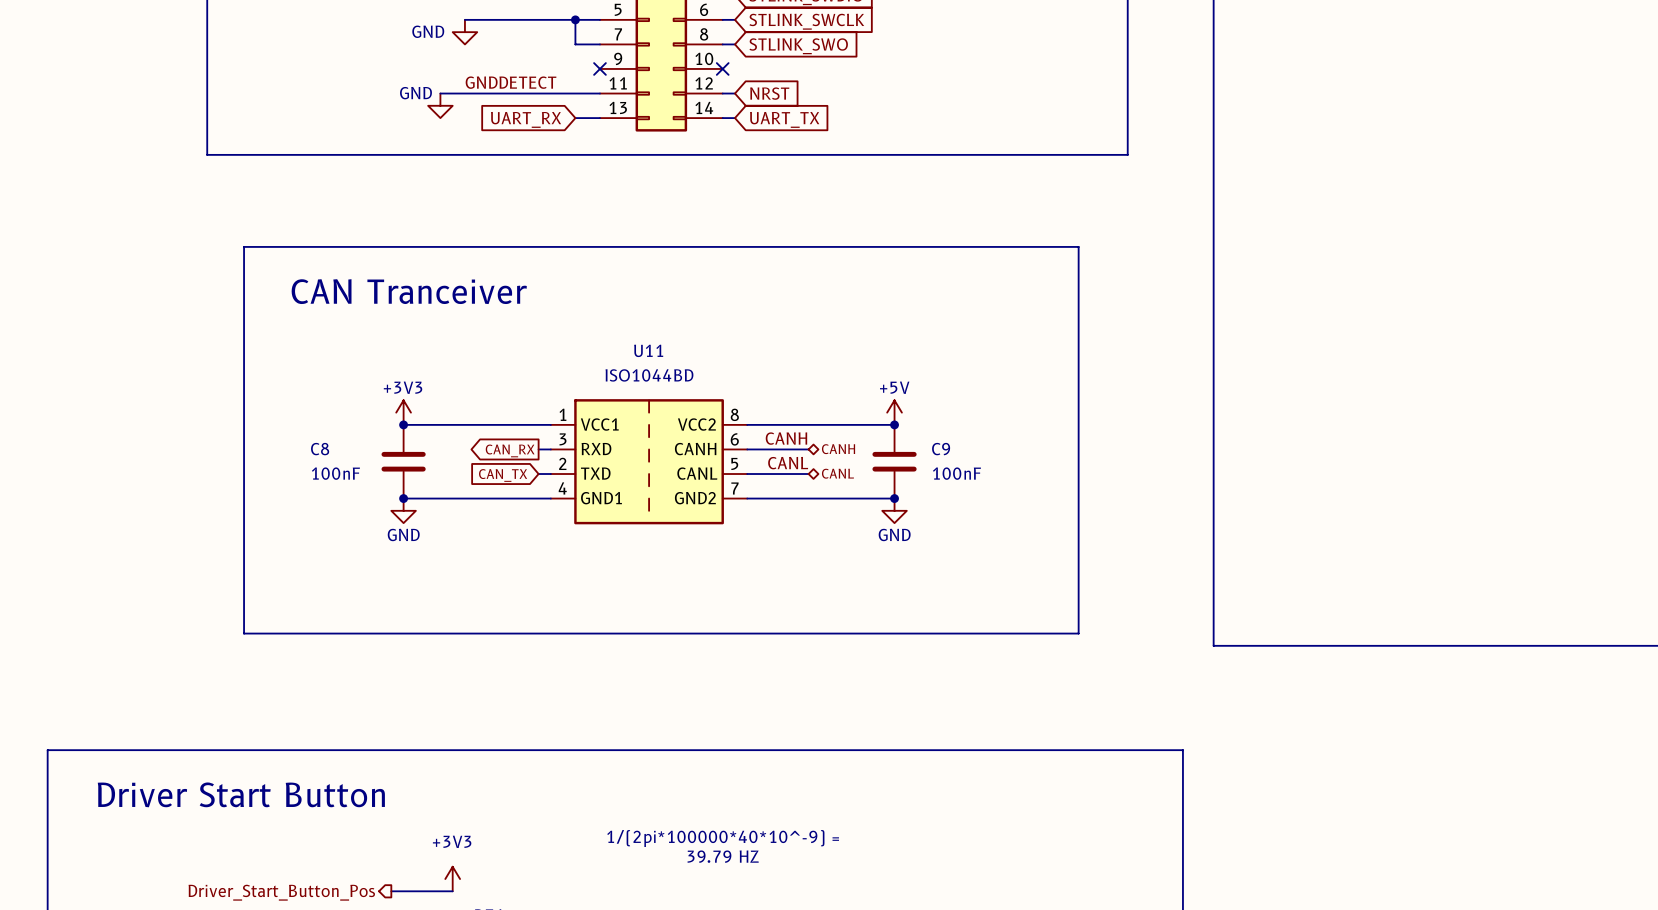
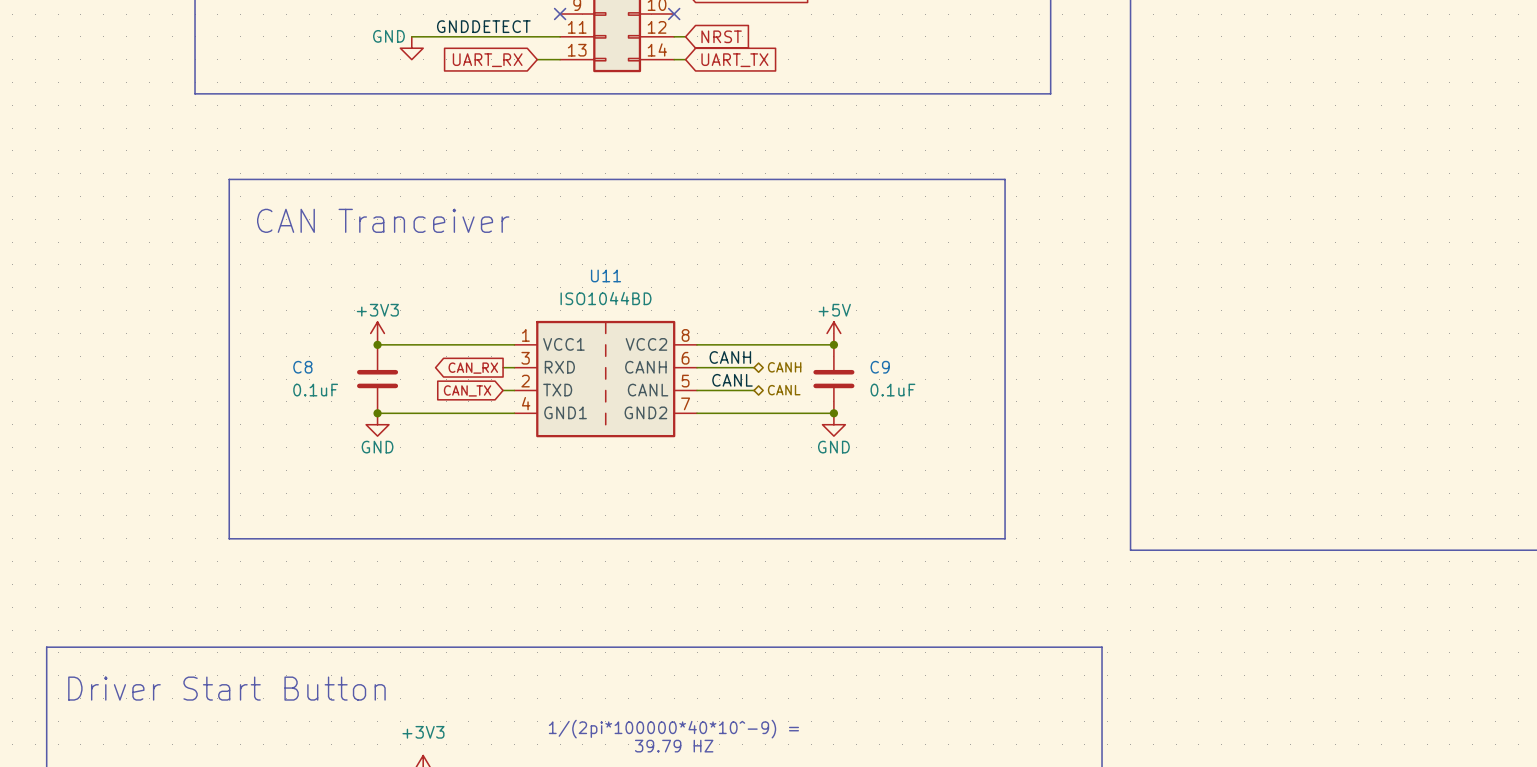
C8 value: 100nF (335, 473) -> 0.1uF (315, 390)
C9 value: 100nF (956, 473) -> 0.1uF (892, 390)

